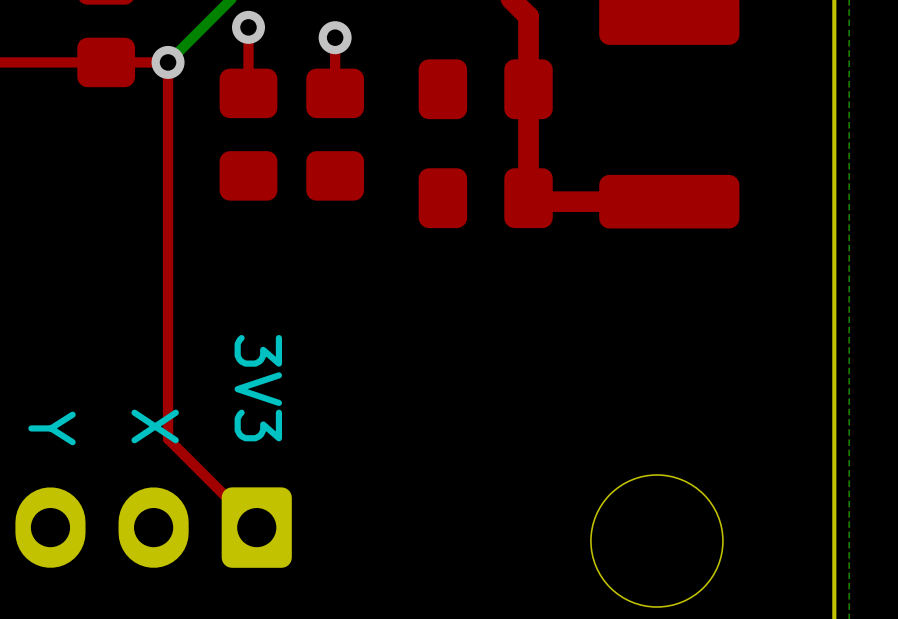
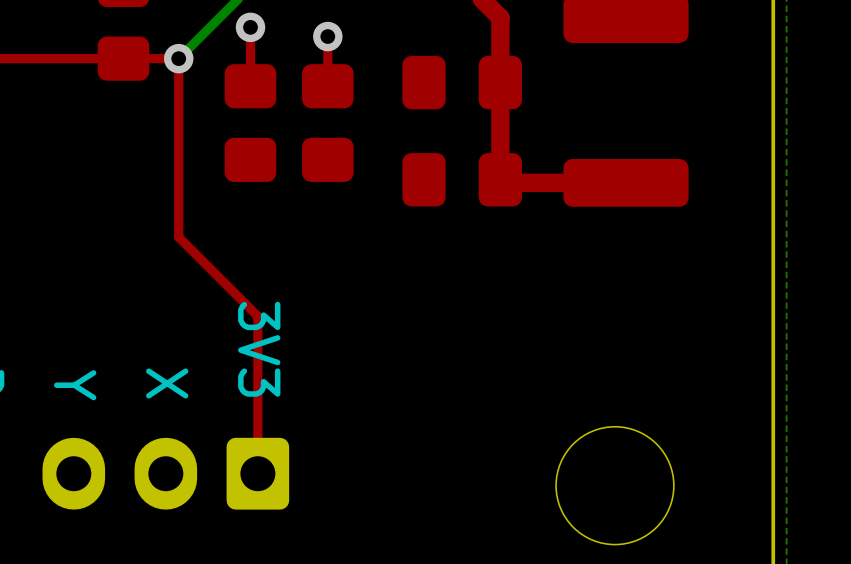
top track: (168, 262) (168, 438) (256, 527) -> (178, 237) (257, 316) (257, 473)

